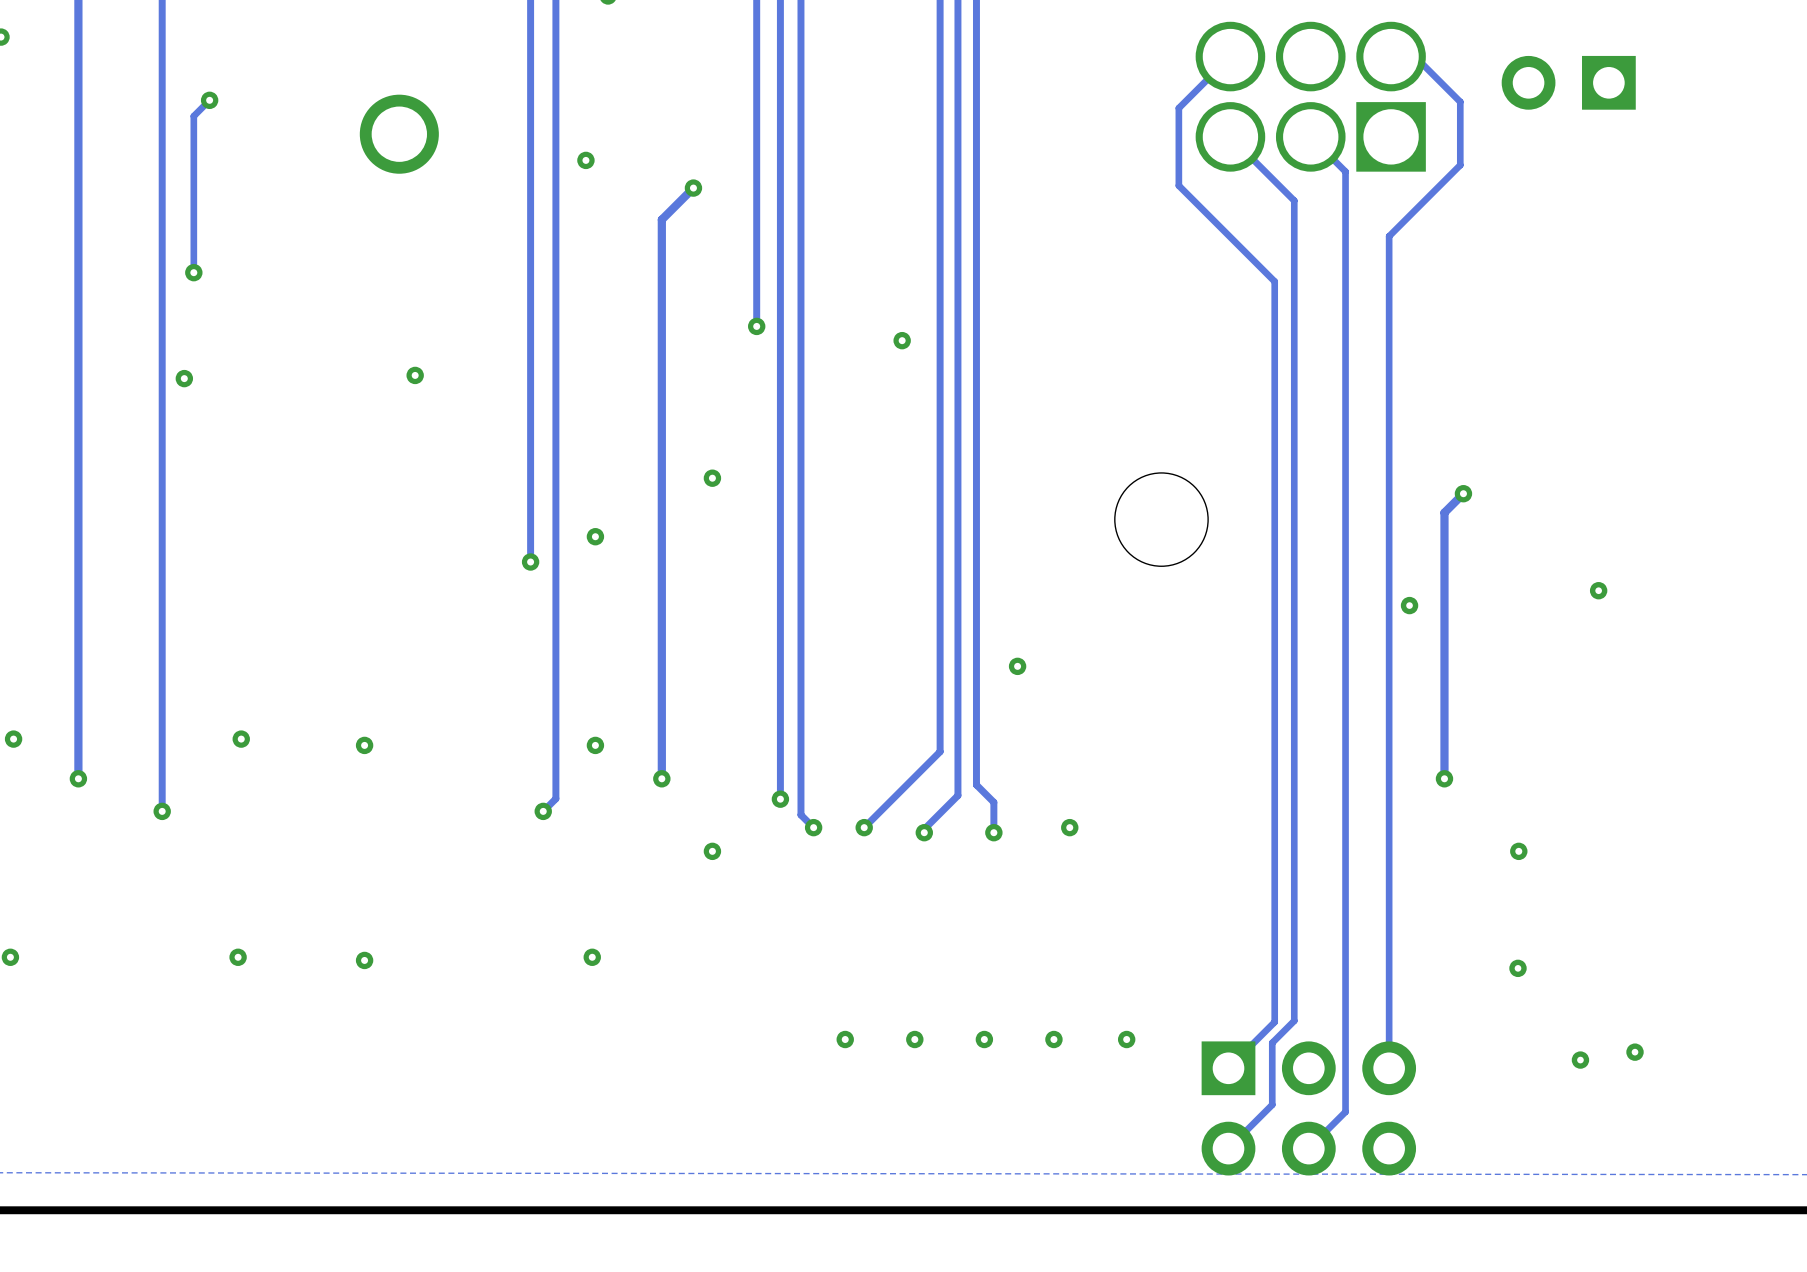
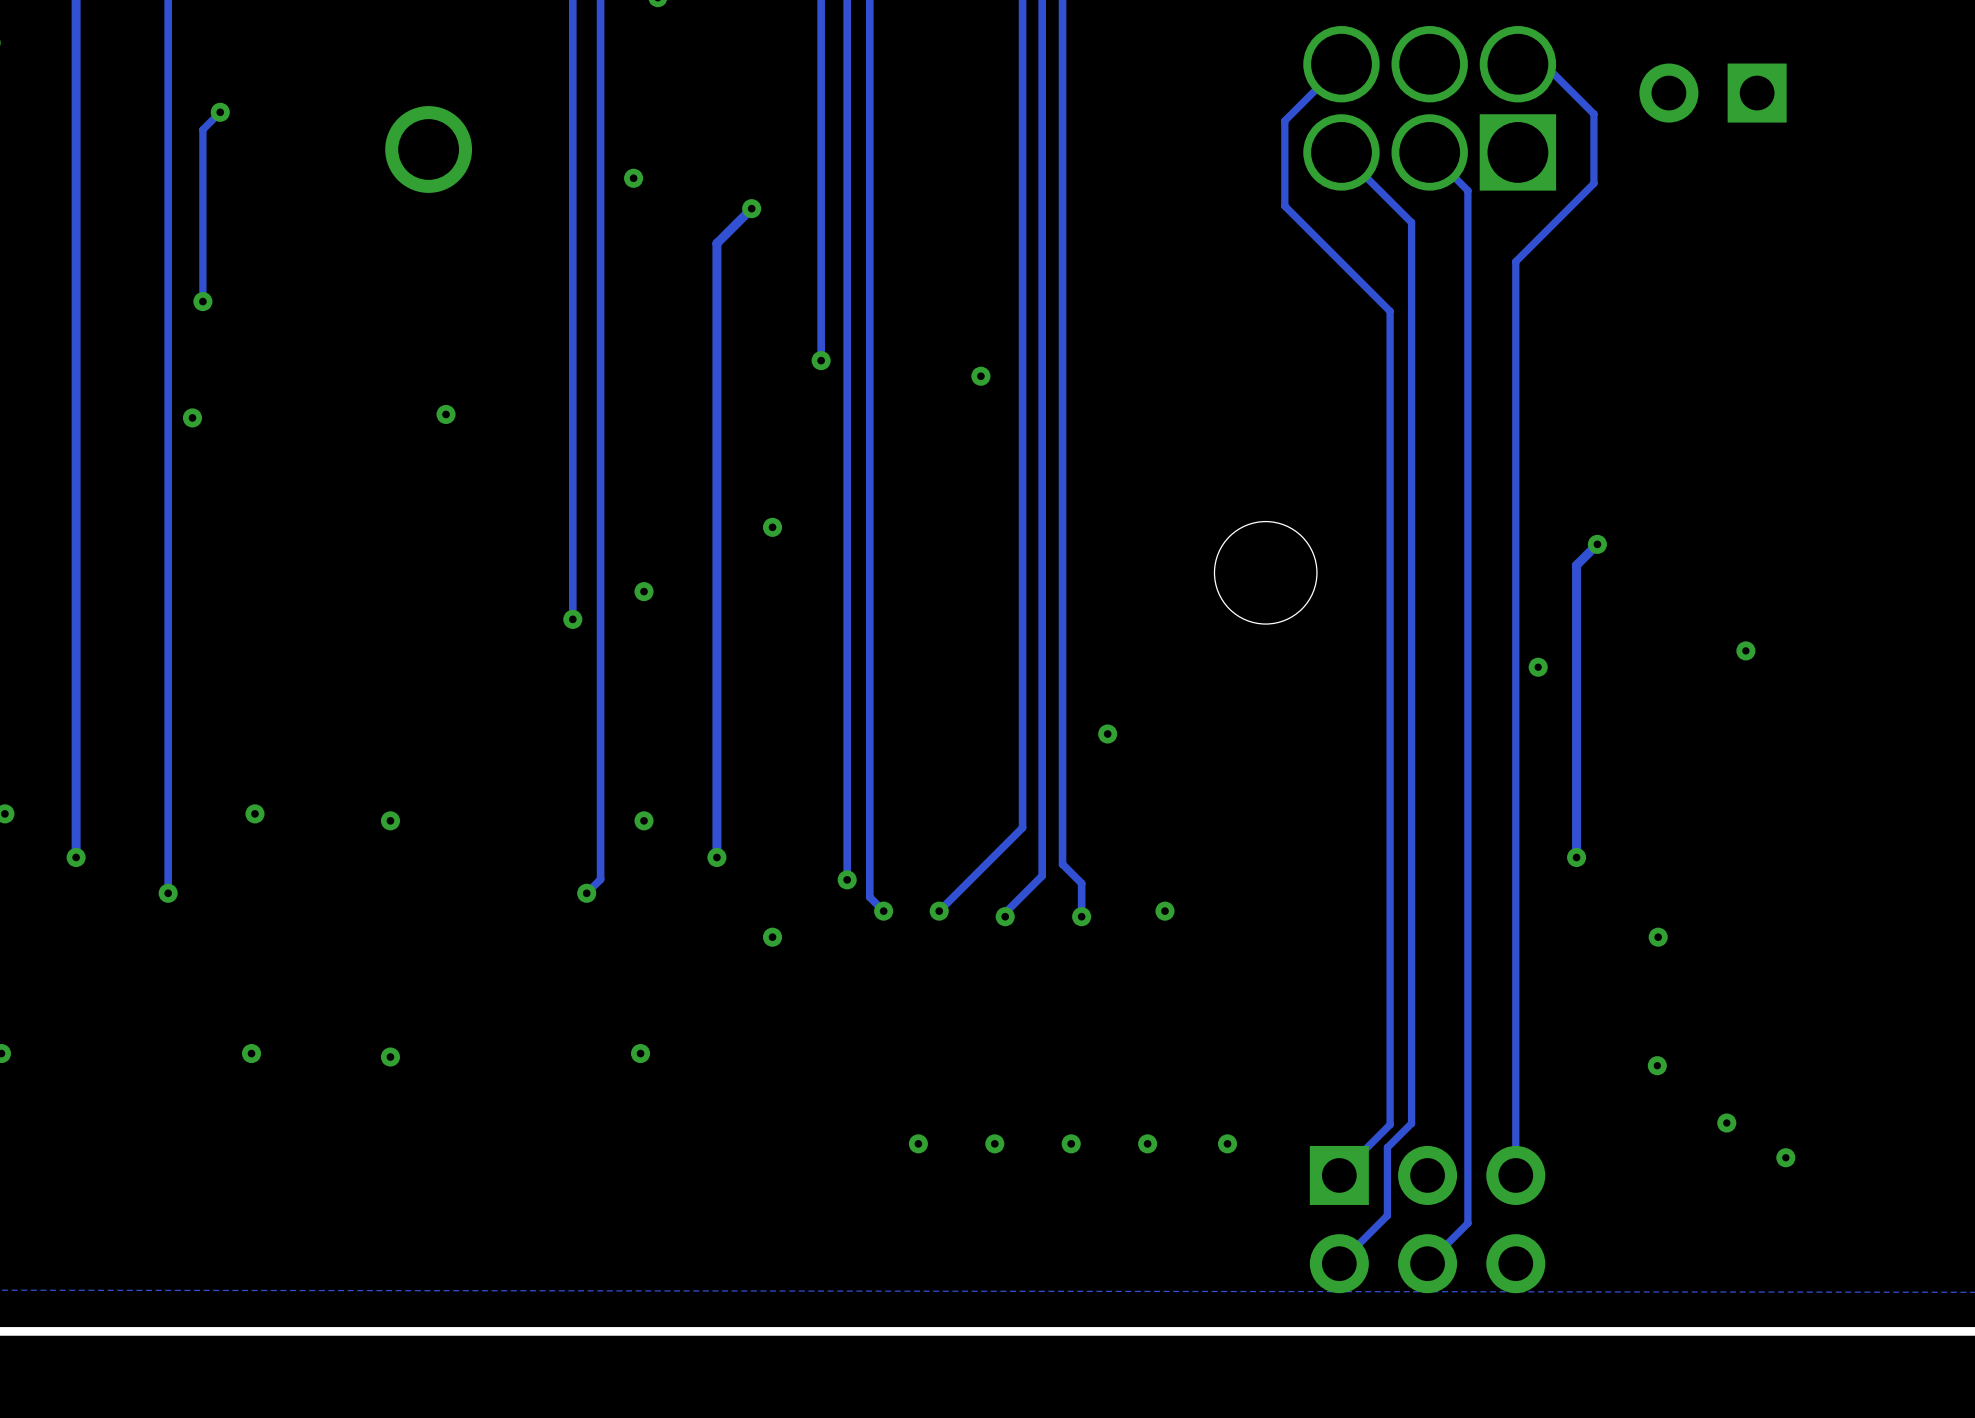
via position: (1580, 1060) -> (1726, 1123)

